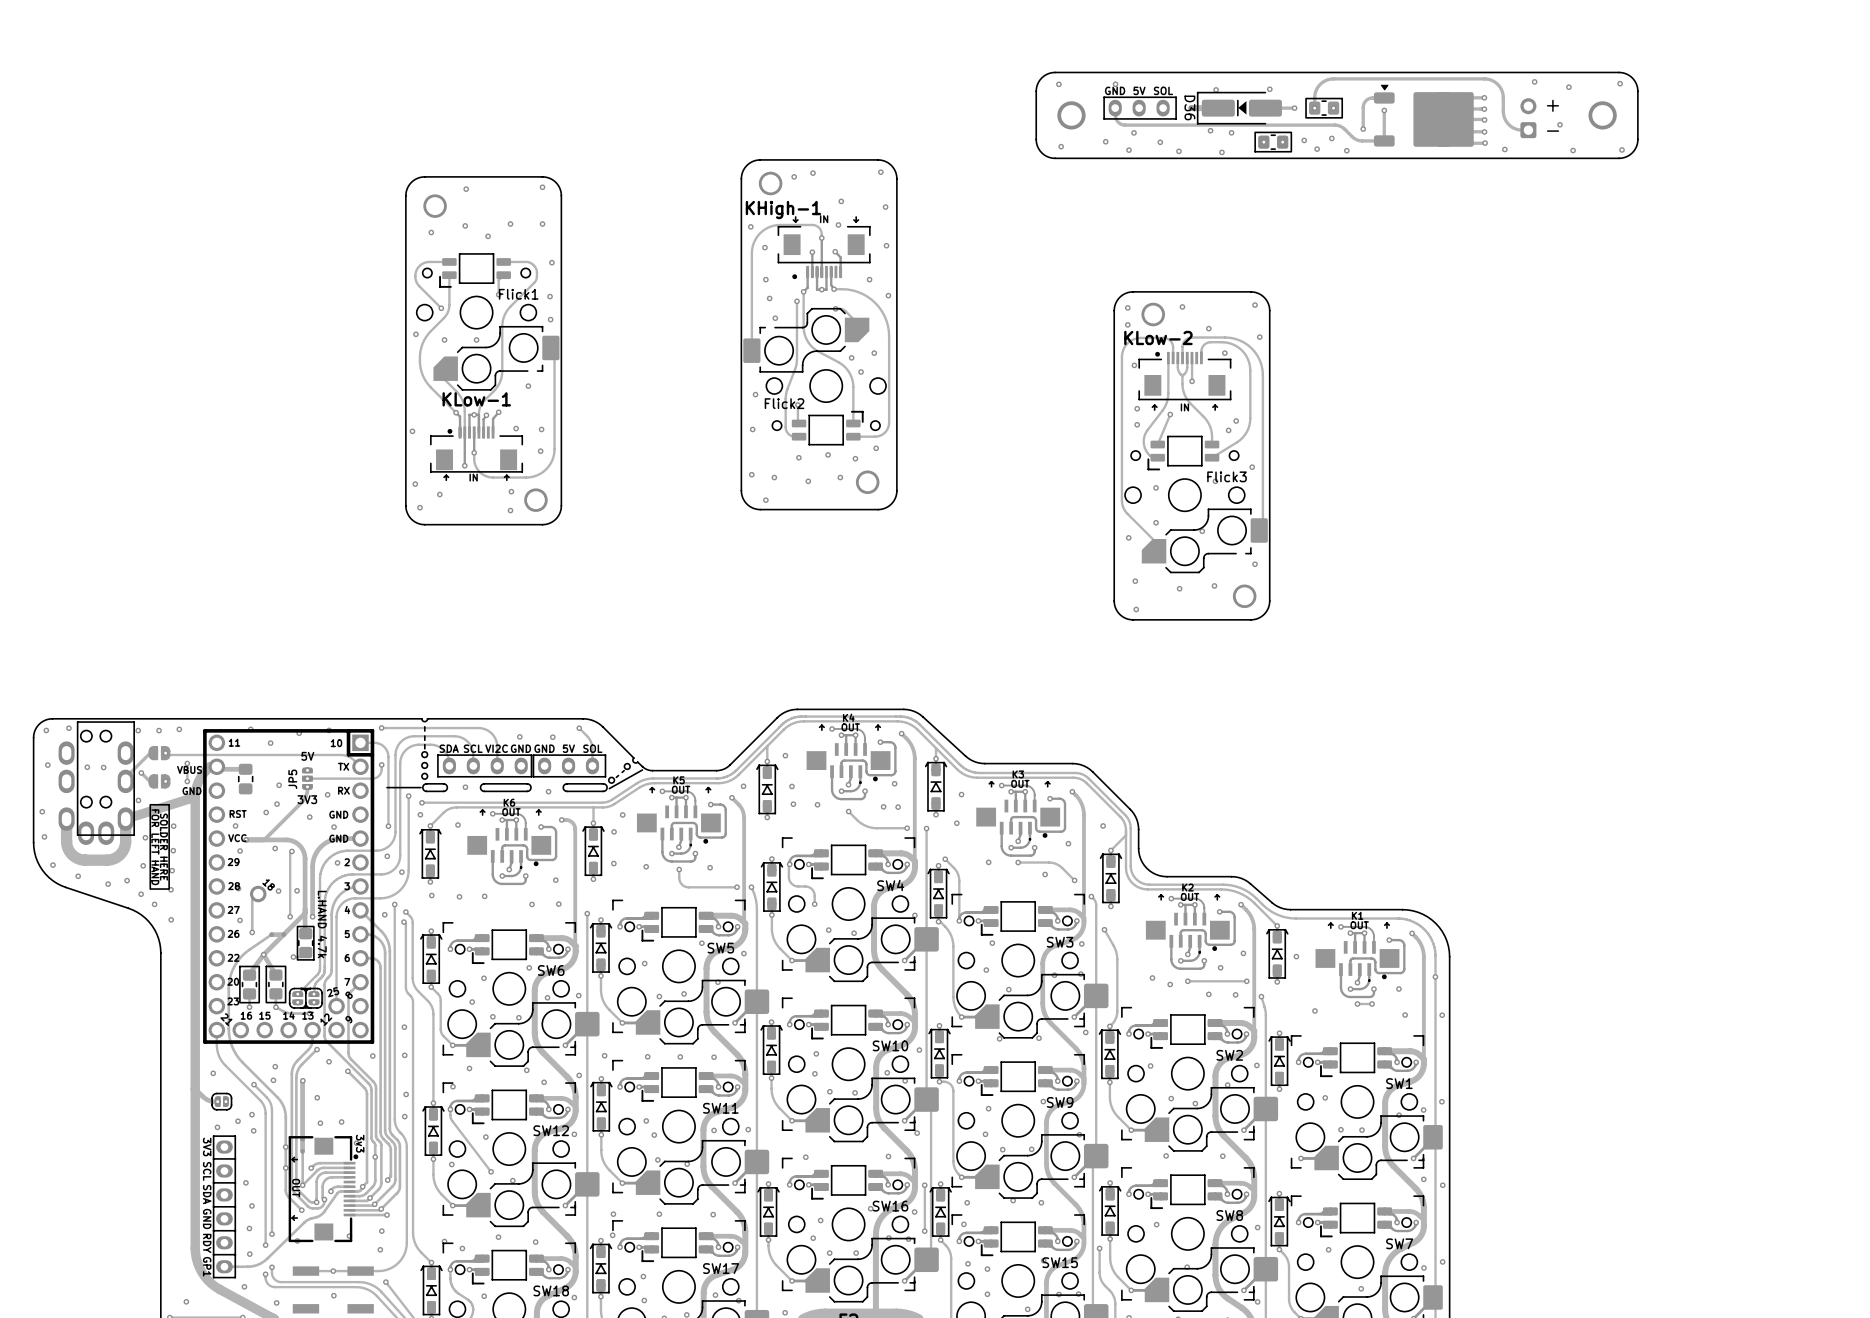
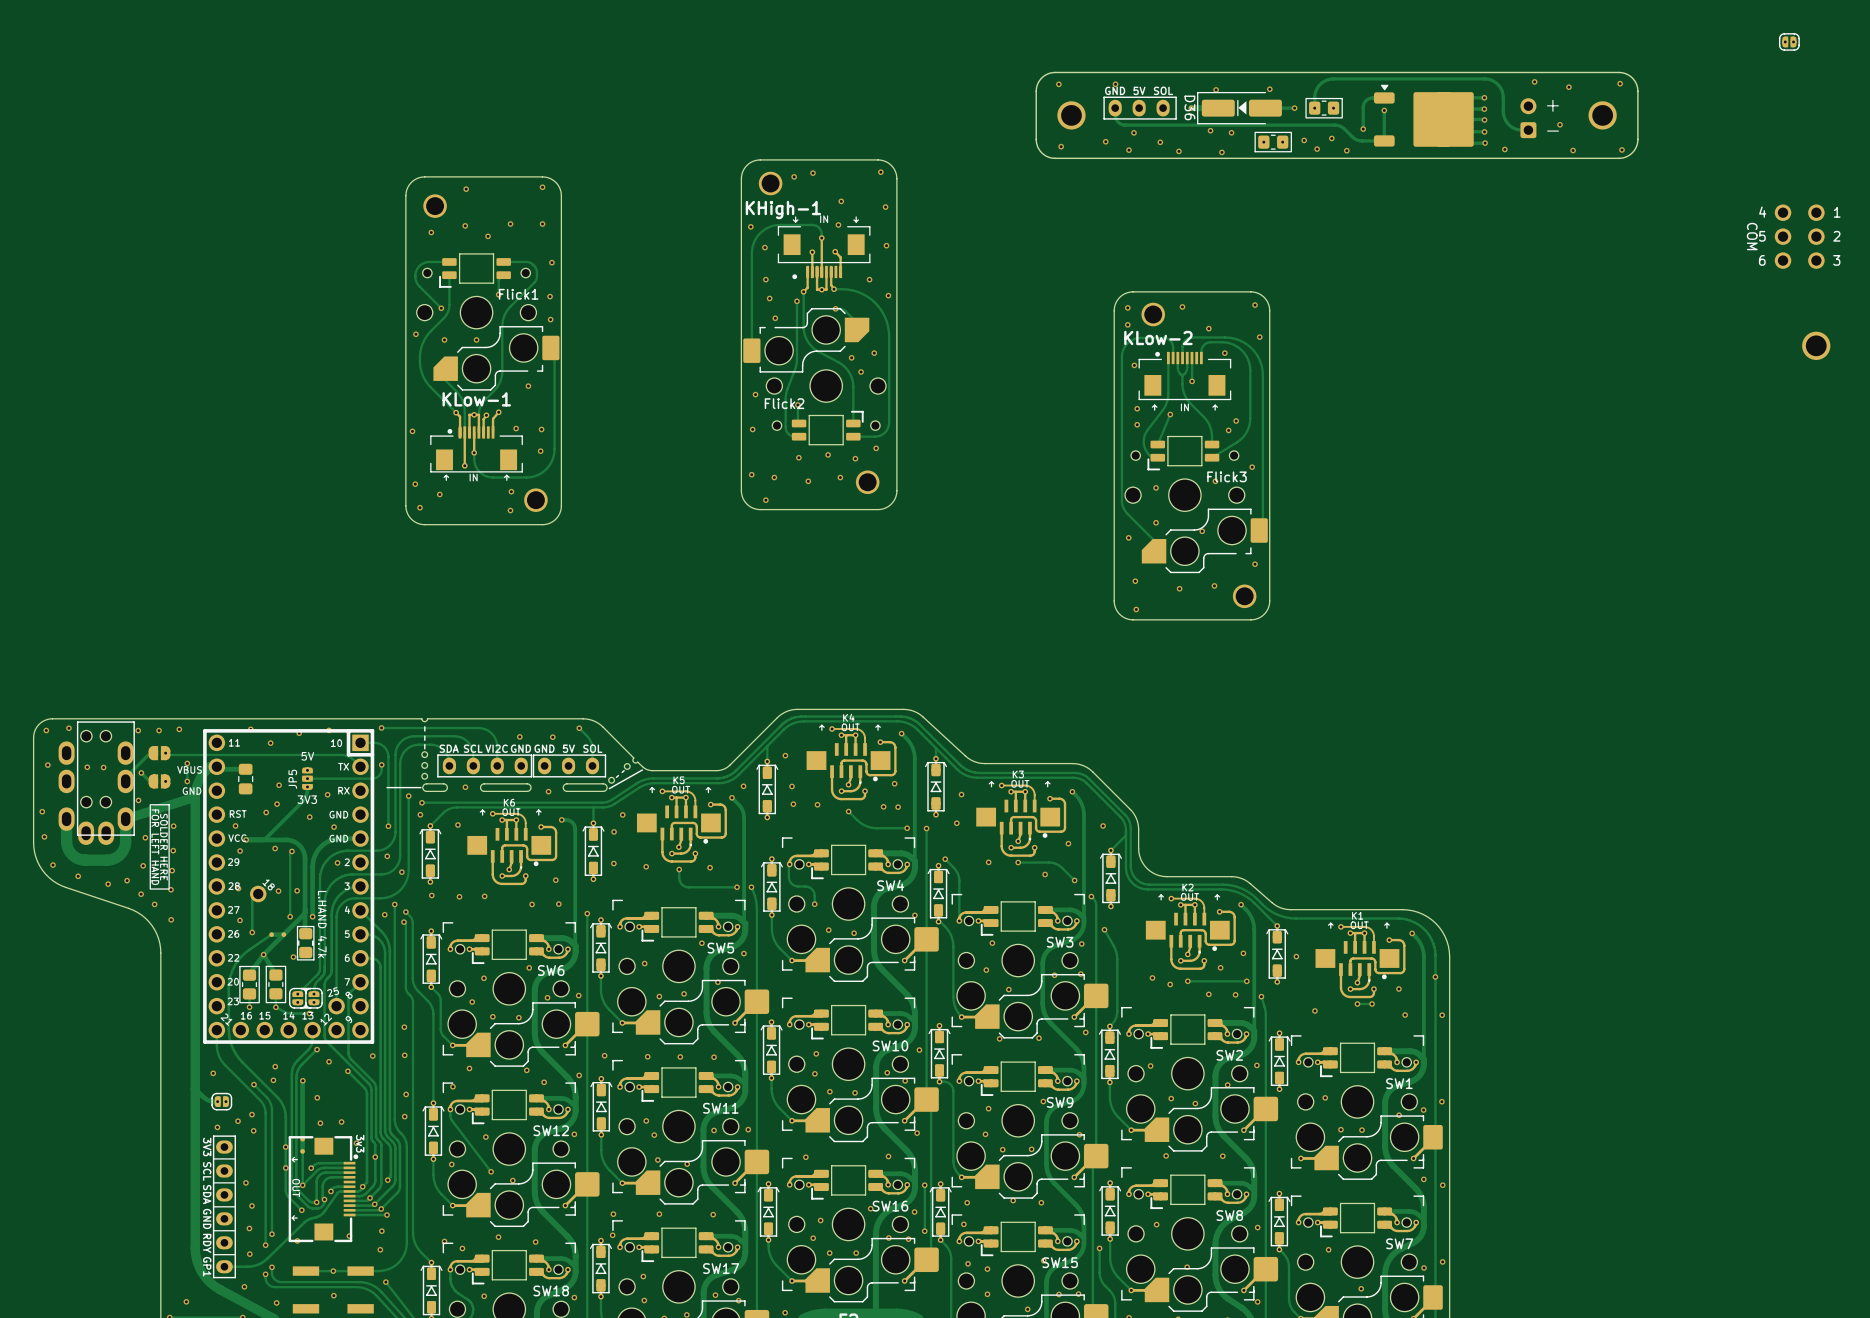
part: none -> (1789, 41)
part: none -> (1799, 236)
part: none -> (1816, 345)

